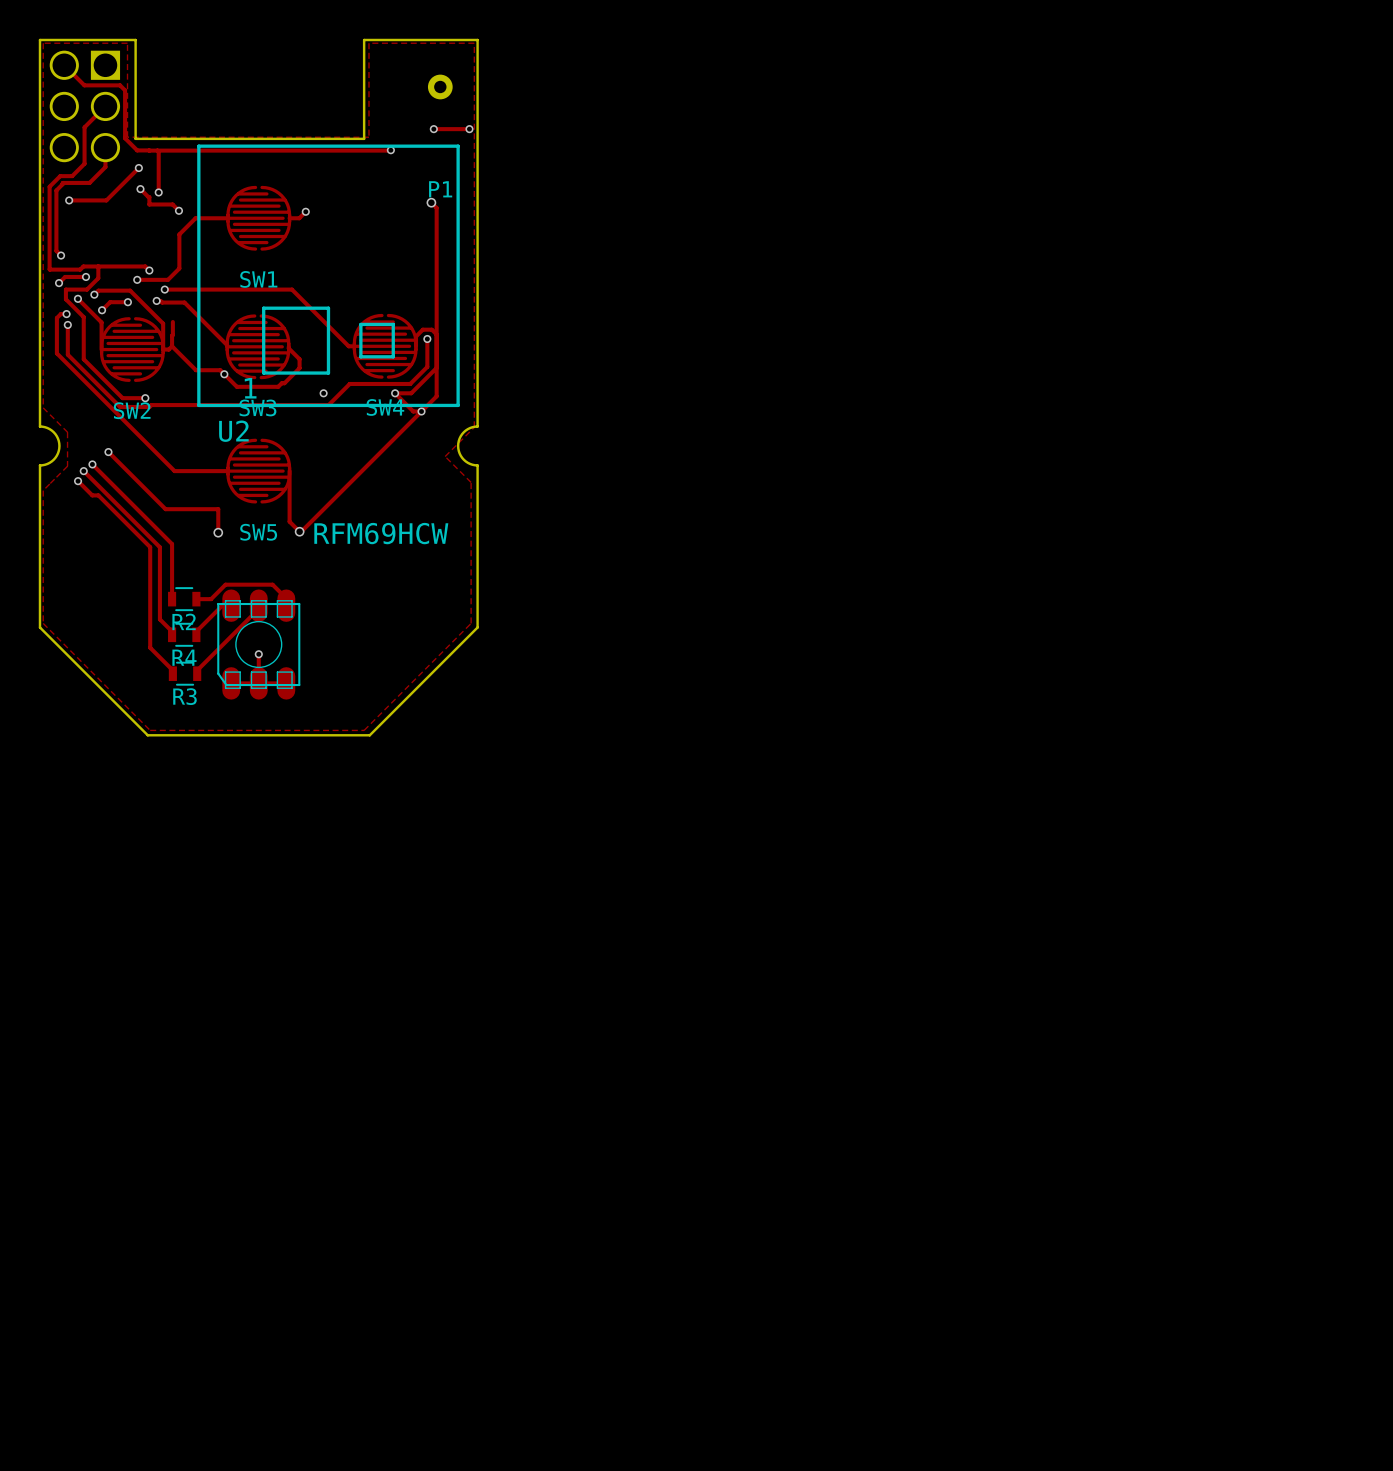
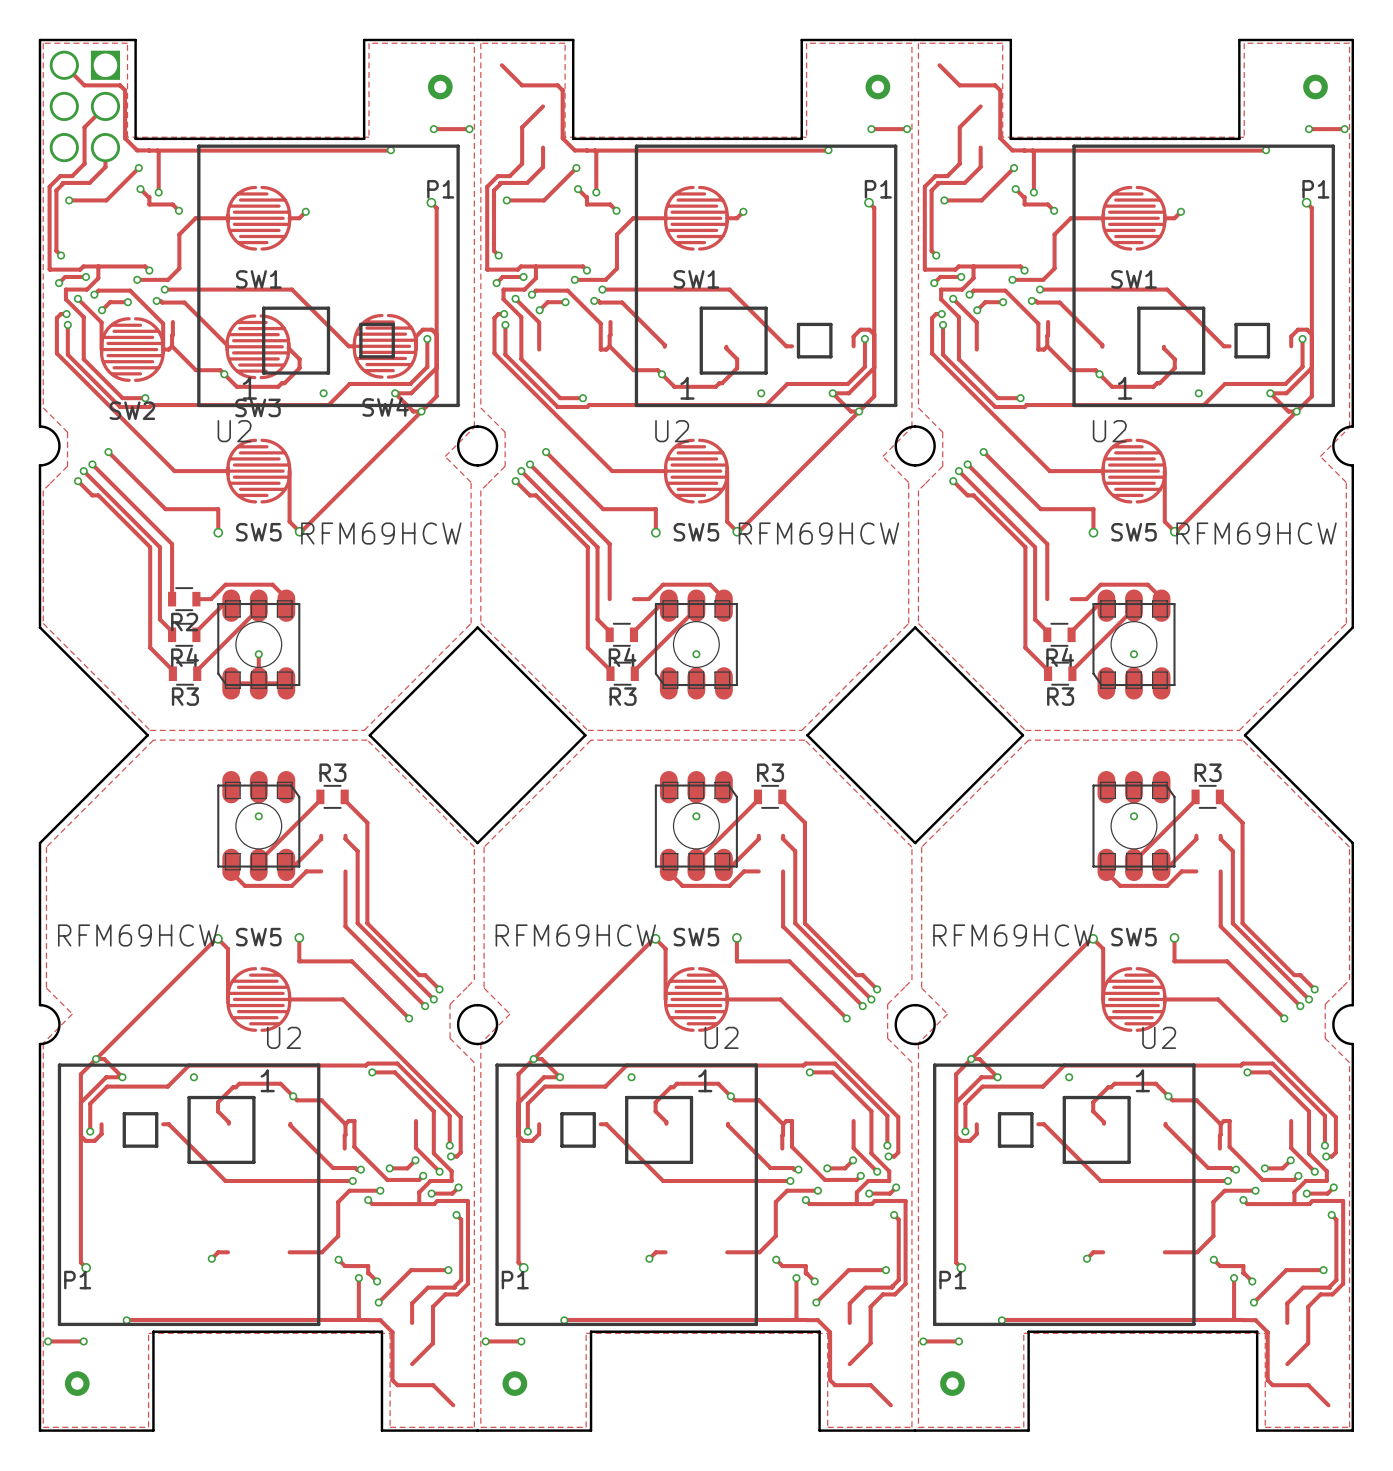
board edge: (477, 39) (477, 426) -> (477, 39) (573, 39) (573, 138) (801, 138) (801, 39) (1010, 39) (1010, 138) (1239, 138) (1239, 39) (1352, 39) (1352, 426) (1339, 432) (1333, 445) (1339, 459) (1352, 465) (1352, 627) (1245, 735) (1352, 843) (1352, 1005) (1339, 1010) (1333, 1024) (1339, 1038) (1352, 1044) (1352, 1430) (1257, 1430) (1257, 1331) (1028, 1331) (1028, 1430) (819, 1430) (819, 1331) (591, 1331) (591, 1430) (381, 1430) (381, 1331) (153, 1331) (153, 1430) (39, 1430) (39, 1044) (53, 1038) (59, 1024) (53, 1010) (39, 1005) (39, 843) (147, 735)
zone outline: none -> (480, 43) (565, 43) (565, 137) (806, 137) (806, 43) (911, 43) (911, 427) (882, 456) (908, 482) (908, 623) (801, 730) (587, 730) (480, 623) (480, 490) (505, 466) (505, 432) (480, 407) (480, 43)
zone outline: none -> (918, 43) (1002, 43) (1002, 137) (1244, 137) (1244, 43) (1349, 43) (1349, 427) (1320, 456) (1346, 482) (1346, 623) (1239, 730) (1025, 730) (918, 623) (918, 490) (942, 466) (942, 432) (918, 407) (918, 43)
track: none -> (501, 65) (521, 85) (557, 85) (562, 90) (562, 138) (574, 150) (586, 150)
track: none -> (939, 65) (959, 85) (995, 85) (1000, 90) (1000, 138) (1012, 150) (1024, 150)
P1: none -> (877, 86)
P1: none -> (1315, 86)
track: none -> (543, 106) (522, 127) (522, 163) (509, 176) (497, 176) (487, 186) (487, 269) (517, 269) (521, 266) (582, 266) (586, 270)
track: none -> (980, 106) (959, 127) (959, 163) (947, 176) (935, 176) (924, 186) (924, 269) (955, 269) (958, 266) (1020, 266) (1024, 270)
track: none -> (871, 129) (907, 129)
via: none -> (871, 129)
via: none -> (907, 129)
track: none -> (1309, 129) (1344, 129)
via: none -> (1309, 129)
via: none -> (1344, 129)
track: none -> (543, 147) (543, 167) (527, 182) (500, 182) (494, 190) (494, 250) (498, 255)
track: none -> (980, 147) (980, 167) (964, 182) (938, 182) (931, 190) (931, 250) (936, 255)
track: none -> (595, 150) (596, 192)
track: none -> (828, 150) (586, 150)
via: none -> (828, 150)
track: none -> (1032, 150) (1033, 192)
track: none -> (1266, 150) (1024, 150)
via: none -> (1266, 150)
track: none -> (576, 168) (544, 200) (506, 200)
via: none -> (576, 168)
track: none -> (1014, 168) (981, 200) (944, 200)
via: none -> (1014, 168)
track: none -> (578, 189) (586, 197) (586, 204) (610, 204) (616, 210)
via: none -> (578, 189)
track: none -> (1015, 189) (1024, 197) (1024, 204) (1047, 204) (1054, 210)
via: none -> (1015, 189)
via: none -> (596, 192)
via: none -> (1033, 192)
via: none -> (506, 200)
via: none -> (944, 200)
track: none -> (868, 202) (874, 207) (874, 396) (738, 531) (727, 521) (727, 471)
via: none -> (868, 202)
track: none -> (1306, 202) (1311, 207) (1311, 396) (1176, 531) (1164, 521) (1164, 471)
via: none -> (1306, 202)
via: none -> (616, 210)
via: none -> (1054, 210)
track: none -> (743, 211) (736, 218) (727, 218)
via: none -> (743, 211)
track: none -> (1180, 211) (1174, 218) (1164, 218)
via: none -> (1180, 211)
track: none -> (665, 218) (633, 218) (616, 234) (616, 268) (605, 279) (574, 279)
SW1: none -> (696, 218)
track: none -> (1103, 218) (1070, 218) (1054, 234) (1054, 268) (1043, 279) (1012, 279)
SW1: none -> (1133, 218)
via: none -> (498, 255)
via: none -> (936, 255)
track: none -> (535, 266) (535, 278) (524, 289) (503, 289) (503, 299) (521, 317) (521, 359) (560, 398) (582, 398)
track: none -> (973, 266) (973, 278) (962, 289) (941, 289) (941, 299) (958, 317) (958, 359) (997, 398) (1020, 398)
via: none -> (586, 270)
via: none -> (1024, 270)
U2: none -> RFM69HCW (766, 275)
U2: none -> RFM69HCW (1203, 275)
track: none -> (523, 276) (502, 276) (496, 283)
via: none -> (523, 276)
track: none -> (961, 276) (940, 276) (934, 283)
via: none -> (961, 276)
via: none -> (574, 279)
via: none -> (1012, 279)
via: none -> (496, 283)
via: none -> (934, 283)
track: none -> (602, 289) (729, 289) (786, 346) (792, 346)
via: none -> (602, 289)
track: none -> (1039, 289) (1167, 289) (1223, 346) (1229, 346)
via: none -> (1039, 289)
track: none -> (531, 294) (536, 290) (567, 290) (600, 323) (600, 349) (606, 349) (609, 346)
via: none -> (531, 294)
track: none -> (969, 294) (973, 290) (1005, 290) (1038, 323) (1038, 349) (1044, 349) (1047, 346)
via: none -> (969, 294)
track: none -> (515, 298) (539, 322) (539, 349)
via: none -> (515, 298)
track: none -> (953, 298) (976, 322) (976, 349)
via: none -> (953, 298)
track: none -> (594, 300) (622, 302) (664, 346)
via: none -> (594, 300)
track: none -> (1031, 300) (1059, 302) (1102, 346)
via: none -> (1031, 300)
track: none -> (565, 302) (547, 302) (539, 310)
via: none -> (565, 302)
track: none -> (1003, 302) (985, 302) (977, 310)
via: none -> (1003, 302)
via: none -> (539, 310)
via: none -> (977, 310)
track: none -> (504, 314) (498, 314) (494, 318) (494, 353) (612, 471) (665, 471)
via: none -> (504, 314)
track: none -> (941, 314) (936, 314) (932, 318) (932, 353) (1049, 471) (1103, 471)
via: none -> (941, 314)
track: none -> (610, 321) (609, 346)
track: none -> (1048, 321) (1047, 346)
track: none -> (505, 324) (505, 354) (557, 407) (587, 407) (589, 405) (766, 405) (787, 383) (847, 383) (864, 366) (864, 339)
via: none -> (505, 324)
track: none -> (943, 324) (943, 354) (995, 407) (1024, 407) (1026, 405) (1203, 405) (1224, 383) (1285, 383) (1302, 366) (1302, 339)
via: none -> (943, 324)
track: none -> (874, 334) (869, 329) (860, 329) (853, 336) (853, 346)
track: none -> (1311, 334) (1307, 329) (1298, 329) (1291, 336) (1291, 346)
via: none -> (864, 339)
via: none -> (1302, 339)
track: none -> (609, 346) (633, 370) (657, 370) (674, 386) (715, 386) (722, 383) (737, 368) (737, 359) (726, 346)
track: none -> (1047, 346) (1071, 370) (1095, 370) (1112, 386) (1153, 386) (1159, 383) (1174, 368) (1174, 359) (1163, 346)
track: none -> (874, 367) (848, 393) (832, 393) (850, 411) (859, 411)
track: none -> (1311, 367) (1286, 393) (1270, 393) (1288, 411) (1296, 411)
via: none -> (661, 374)
via: none -> (1099, 374)
via: none -> (761, 393)
via: none -> (832, 393)
via: none -> (1198, 393)
via: none -> (1270, 393)
via: none -> (582, 398)
via: none -> (1020, 398)
via: none -> (859, 411)
via: none -> (1296, 411)
board edge: none -> (915, 426) (928, 432) (934, 445) (928, 459) (915, 465) (901, 459) (895, 445) (901, 432) (915, 426)
track: none -> (546, 452) (603, 509) (655, 509) (655, 532)
via: none -> (546, 452)
track: none -> (983, 452) (1040, 509) (1093, 509) (1093, 532)
via: none -> (983, 452)
track: none -> (530, 464) (609, 544) (609, 599)
via: none -> (530, 464)
track: none -> (967, 464) (1047, 544) (1047, 599)
via: none -> (967, 464)
board edge: (477, 465) (477, 627) -> (477, 465) (491, 459) (497, 445) (491, 432) (477, 426)
track: none -> (521, 471) (597, 547) (597, 619) (609, 631) (609, 634)
via: none -> (521, 471)
SW5: none -> (696, 471)
track: none -> (958, 471) (1035, 547) (1035, 619) (1047, 631) (1047, 634)
via: none -> (958, 471)
SW5: none -> (1133, 471)
track: none -> (515, 481) (529, 495) (536, 495) (587, 547) (587, 647) (610, 670) (610, 673)
via: none -> (515, 481)
track: none -> (953, 481) (967, 495) (973, 495) (1025, 547) (1025, 647) (1048, 670) (1048, 673)
via: none -> (953, 481)
via: none -> (737, 531)
via: none -> (1174, 531)
via: none -> (655, 532)
via: none -> (1093, 532)
track: none -> (633, 599) (648, 599) (663, 584) (710, 584) (723, 598) (723, 605)
track: none -> (1071, 599) (1086, 599) (1100, 584) (1147, 584) (1161, 598) (1161, 605)
track: none -> (668, 605) (659, 605) (633, 631) (633, 634)
track: none -> (696, 605) (696, 608) (634, 670) (634, 673)
track: none -> (1106, 605) (1097, 605) (1071, 631) (1071, 634)
track: none -> (1133, 605) (1133, 608) (1072, 670) (1072, 673)
board edge: none -> (915, 627) (807, 735) (915, 843) (1022, 735) (915, 627)
R4: none -> (621, 634)
R4: none -> (1059, 634)
part: none -> (696, 644)
part: none -> (1133, 644)
via: none -> (696, 654)
via: none -> (1133, 654)
R3: none -> (622, 673)
R3: none -> (1060, 673)
board edge: (147, 735) (369, 735) -> (477, 627) (585, 735) (477, 843) (369, 735)
zone outline: none -> (153, 740) (367, 740) (474, 847) (474, 980) (450, 1004) (450, 1038) (474, 1062) (474, 1427) (390, 1427) (390, 1333) (148, 1333) (148, 1427) (43, 1427) (43, 1043) (72, 1014) (46, 988) (46, 847) (153, 740)
zone outline: none -> (591, 740) (804, 740) (911, 847) (911, 980) (887, 1004) (887, 1038) (911, 1062) (911, 1427) (827, 1427) (827, 1333) (586, 1333) (586, 1427) (480, 1427) (480, 1043) (510, 1014) (484, 988) (484, 847) (591, 740)
zone outline: none -> (1028, 740) (1242, 740) (1349, 847) (1349, 980) (1325, 1004) (1325, 1038) (1349, 1062) (1349, 1427) (1265, 1427) (1265, 1333) (1023, 1333) (1023, 1427) (918, 1427) (918, 1043) (947, 1014) (921, 988) (921, 847) (1028, 740)
track: none -> (320, 796) (320, 800) (258, 861) (258, 864)
R3: none -> (332, 796)
track: none -> (344, 796) (344, 800) (367, 822) (367, 923) (419, 975) (425, 975) (439, 989)
track: none -> (757, 796) (757, 800) (696, 861) (696, 864)
R3: none -> (770, 796)
track: none -> (782, 796) (782, 800) (804, 822) (804, 923) (856, 975) (862, 975) (877, 989)
track: none -> (1195, 796) (1195, 800) (1133, 861) (1133, 864)
R3: none -> (1207, 796)
track: none -> (1219, 796) (1219, 800) (1242, 822) (1242, 923) (1294, 975) (1300, 975) (1314, 989)
via: none -> (258, 816)
via: none -> (696, 816)
via: none -> (1133, 816)
part: none -> (258, 826)
part: none -> (696, 826)
part: none -> (1133, 826)
track: none -> (321, 835) (321, 839) (295, 864) (286, 864)
track: none -> (345, 835) (345, 839) (357, 851) (357, 923) (433, 999)
track: none -> (758, 835) (758, 839) (732, 864) (723, 864)
track: none -> (783, 835) (783, 839) (795, 851) (795, 923) (871, 999)
track: none -> (1196, 835) (1196, 839) (1170, 864) (1161, 864)
track: none -> (1220, 835) (1220, 839) (1232, 851) (1232, 923) (1309, 999)
track: none -> (231, 864) (231, 872) (244, 885) (292, 885) (306, 871) (321, 871)
track: none -> (668, 864) (668, 872) (682, 885) (729, 885) (744, 871) (758, 871)
track: none -> (1106, 864) (1106, 872) (1120, 885) (1167, 885) (1181, 871) (1196, 871)
track: none -> (345, 871) (345, 926) (425, 1006)
track: none -> (783, 871) (783, 926) (862, 1006)
track: none -> (1220, 871) (1220, 926) (1300, 1006)
track: none -> (299, 937) (299, 961) (351, 961) (409, 1018)
via: none -> (299, 937)
track: none -> (736, 937) (736, 961) (789, 961) (846, 1018)
via: none -> (736, 937)
track: none -> (1174, 937) (1174, 961) (1227, 961) (1284, 1018)
via: none -> (1174, 937)
via: none -> (217, 938)
via: none -> (655, 938)
via: none -> (1093, 938)
via: none -> (439, 989)
via: none -> (877, 989)
via: none -> (1314, 989)
track: none -> (227, 999) (227, 948) (216, 938) (80, 1074) (80, 1262) (86, 1267)
SW5: none -> (258, 999)
track: none -> (289, 999) (342, 999) (460, 1117) (460, 1152) (456, 1156) (451, 1156)
via: none -> (433, 999)
track: none -> (665, 999) (665, 948) (653, 938) (518, 1074) (518, 1262) (523, 1267)
SW5: none -> (696, 999)
track: none -> (727, 999) (780, 999) (898, 1117) (898, 1152) (894, 1156) (888, 1156)
via: none -> (871, 999)
track: none -> (1103, 999) (1103, 948) (1091, 938) (956, 1074) (956, 1262) (961, 1267)
SW5: none -> (1133, 999)
track: none -> (1164, 999) (1218, 999) (1335, 1117) (1335, 1152) (1331, 1156) (1326, 1156)
via: none -> (1309, 999)
board edge: none -> (477, 1005) (491, 1010) (497, 1024) (491, 1038) (477, 1044) (463, 1038) (458, 1024) (463, 1010) (477, 1005)
board edge: none -> (915, 1005) (928, 1010) (934, 1024) (928, 1038) (915, 1044) (901, 1038) (895, 1024) (901, 1010) (915, 1005)
via: none -> (425, 1006)
via: none -> (862, 1006)
via: none -> (1300, 1006)
via: none -> (409, 1018)
via: none -> (846, 1018)
via: none -> (1284, 1018)
track: none -> (96, 1059) (104, 1059) (122, 1077) (106, 1077) (80, 1102)
via: none -> (96, 1059)
track: none -> (533, 1059) (541, 1059) (560, 1077) (543, 1077) (518, 1102)
via: none -> (533, 1059)
track: none -> (971, 1059) (979, 1059) (997, 1077) (981, 1077) (956, 1102)
via: none -> (971, 1059)
track: none -> (372, 1072) (394, 1072) (433, 1111) (433, 1153) (451, 1171) (451, 1180) (430, 1180) (419, 1192) (419, 1204)
via: none -> (372, 1072)
track: none -> (809, 1072) (832, 1072) (871, 1111) (871, 1153) (889, 1171) (889, 1180) (868, 1180) (856, 1192) (856, 1204)
via: none -> (809, 1072)
track: none -> (1247, 1072) (1270, 1072) (1309, 1111) (1309, 1153) (1326, 1171) (1326, 1180) (1305, 1180) (1294, 1192) (1294, 1204)
via: none -> (1247, 1072)
via: none -> (122, 1077)
via: none -> (193, 1077)
via: none -> (560, 1077)
via: none -> (631, 1077)
via: none -> (997, 1077)
via: none -> (1069, 1077)
via: none -> (293, 1096)
via: none -> (730, 1096)
via: none -> (1168, 1096)
track: none -> (416, 1121) (416, 1148) (439, 1171)
track: none -> (853, 1121) (853, 1148) (877, 1171)
track: none -> (1291, 1121) (1291, 1148) (1314, 1171)
track: none -> (228, 1123) (218, 1111) (218, 1102) (233, 1087) (239, 1083) (280, 1083) (297, 1100) (321, 1100) (345, 1124)
track: none -> (290, 1123) (333, 1168) (360, 1169)
track: none -> (666, 1123) (655, 1111) (655, 1102) (670, 1087) (676, 1083) (718, 1083) (734, 1100) (759, 1100) (783, 1124)
track: none -> (727, 1123) (770, 1168) (798, 1169)
track: none -> (1104, 1123) (1093, 1111) (1093, 1102) (1108, 1087) (1114, 1083) (1155, 1083) (1172, 1100) (1196, 1100) (1220, 1124)
track: none -> (1165, 1123) (1208, 1168) (1236, 1169)
track: none -> (101, 1124) (101, 1134) (94, 1140) (85, 1140) (80, 1136)
track: none -> (163, 1124) (168, 1124) (225, 1180) (352, 1180)
track: none -> (345, 1124) (348, 1121) (354, 1121) (354, 1146) (387, 1179) (419, 1179) (423, 1175)
track: none -> (345, 1124) (344, 1148)
track: none -> (539, 1124) (539, 1134) (532, 1140) (523, 1140) (518, 1136)
track: none -> (600, 1124) (606, 1124) (663, 1180) (790, 1180)
track: none -> (783, 1124) (786, 1121) (792, 1121) (792, 1146) (824, 1179) (856, 1179) (860, 1175)
track: none -> (783, 1124) (782, 1148)
track: none -> (976, 1124) (976, 1134) (969, 1140) (960, 1140) (956, 1136)
track: none -> (1038, 1124) (1044, 1124) (1100, 1180) (1227, 1180)
track: none -> (1220, 1124) (1223, 1121) (1229, 1121) (1229, 1146) (1262, 1179) (1294, 1179) (1298, 1175)
track: none -> (1220, 1124) (1219, 1148)
track: none -> (90, 1131) (90, 1103) (107, 1086) (167, 1086) (188, 1065) (366, 1065) (368, 1063) (397, 1063) (449, 1115) (449, 1145)
via: none -> (90, 1131)
track: none -> (527, 1131) (527, 1103) (544, 1086) (605, 1086) (626, 1065) (803, 1065) (805, 1063) (835, 1063) (887, 1115) (887, 1145)
via: none -> (527, 1131)
track: none -> (965, 1131) (965, 1103) (982, 1086) (1043, 1086) (1064, 1065) (1241, 1065) (1243, 1063) (1272, 1063) (1324, 1115) (1324, 1145)
via: none -> (965, 1131)
via: none -> (449, 1145)
via: none -> (887, 1145)
via: none -> (1324, 1145)
via: none -> (451, 1156)
via: none -> (888, 1156)
via: none -> (1326, 1156)
track: none -> (415, 1160) (407, 1168) (389, 1168)
via: none -> (415, 1160)
track: none -> (853, 1160) (845, 1168) (827, 1168)
via: none -> (853, 1160)
track: none -> (1290, 1160) (1282, 1168) (1264, 1168)
via: none -> (1290, 1160)
via: none -> (389, 1168)
via: none -> (827, 1168)
via: none -> (1264, 1168)
via: none -> (360, 1169)
via: none -> (798, 1169)
via: none -> (1236, 1169)
via: none -> (439, 1171)
via: none -> (877, 1171)
via: none -> (1314, 1171)
via: none -> (423, 1175)
via: none -> (860, 1175)
via: none -> (1298, 1175)
via: none -> (352, 1180)
via: none -> (790, 1180)
via: none -> (1227, 1180)
track: none -> (458, 1187) (452, 1193) (431, 1193)
via: none -> (458, 1187)
track: none -> (896, 1187) (890, 1193) (869, 1193)
via: none -> (896, 1187)
track: none -> (1333, 1187) (1327, 1193) (1306, 1193)
via: none -> (1333, 1187)
track: none -> (380, 1190) (349, 1190) (338, 1202) (338, 1236) (321, 1252) (289, 1252)
via: none -> (380, 1190)
track: none -> (817, 1190) (787, 1190) (775, 1202) (775, 1236) (759, 1252) (727, 1252)
via: none -> (817, 1190)
track: none -> (1255, 1190) (1224, 1190) (1213, 1202) (1213, 1236) (1197, 1252) (1164, 1252)
via: none -> (1255, 1190)
via: none -> (431, 1193)
via: none -> (869, 1193)
via: none -> (1306, 1193)
U2: none -> RFM69HCW (189, 1194)
U2: none -> RFM69HCW (626, 1194)
U2: none -> RFM69HCW (1064, 1194)
track: none -> (368, 1200) (372, 1204) (434, 1204) (437, 1200) (467, 1201) (467, 1283) (457, 1294) (445, 1294) (433, 1306) (433, 1343) (412, 1364)
via: none -> (368, 1200)
track: none -> (805, 1200) (809, 1204) (871, 1204) (874, 1200) (905, 1201) (905, 1283) (894, 1294) (882, 1294) (870, 1306) (870, 1343) (849, 1364)
via: none -> (805, 1200)
track: none -> (1243, 1200) (1247, 1204) (1309, 1204) (1312, 1200) (1343, 1201) (1343, 1283) (1332, 1294) (1320, 1294) (1308, 1306) (1308, 1343) (1287, 1364)
via: none -> (1243, 1200)
track: none -> (456, 1215) (461, 1219) (461, 1280) (454, 1287) (427, 1287) (412, 1303) (412, 1322)
via: none -> (456, 1215)
track: none -> (894, 1215) (898, 1219) (898, 1280) (892, 1287) (865, 1287) (849, 1303) (849, 1322)
via: none -> (894, 1215)
track: none -> (1331, 1215) (1336, 1219) (1336, 1280) (1329, 1287) (1303, 1287) (1287, 1303) (1287, 1322)
via: none -> (1331, 1215)
track: none -> (227, 1252) (218, 1252) (211, 1258)
track: none -> (665, 1252) (655, 1252) (649, 1258)
track: none -> (1103, 1252) (1093, 1252) (1086, 1258)
via: none -> (211, 1258)
via: none -> (649, 1258)
via: none -> (1086, 1258)
track: none -> (338, 1259) (344, 1266) (368, 1266) (368, 1273) (377, 1281)
via: none -> (338, 1259)
track: none -> (776, 1259) (782, 1266) (805, 1266) (805, 1273) (814, 1281)
via: none -> (776, 1259)
track: none -> (1213, 1259) (1220, 1266) (1243, 1266) (1243, 1273) (1252, 1281)
via: none -> (1213, 1259)
via: none -> (86, 1267)
via: none -> (523, 1267)
via: none -> (961, 1267)
track: none -> (448, 1270) (411, 1270) (378, 1302)
via: none -> (448, 1270)
track: none -> (886, 1270) (848, 1270) (816, 1302)
via: none -> (886, 1270)
track: none -> (1323, 1270) (1286, 1270) (1253, 1302)
via: none -> (1323, 1270)
track: none -> (358, 1278) (360, 1319)
via: none -> (358, 1278)
track: none -> (796, 1278) (797, 1319)
via: none -> (796, 1278)
track: none -> (1234, 1278) (1235, 1319)
via: none -> (1234, 1278)
via: none -> (377, 1281)
via: none -> (814, 1281)
via: none -> (1252, 1281)
via: none -> (378, 1302)
via: none -> (816, 1302)
via: none -> (1253, 1302)
track: none -> (368, 1319) (126, 1320)
track: none -> (805, 1319) (564, 1320)
track: none -> (1243, 1319) (1001, 1320)
via: none -> (126, 1320)
track: none -> (368, 1320) (380, 1320) (392, 1332) (392, 1380) (397, 1385) (433, 1385) (453, 1405)
via: none -> (564, 1320)
track: none -> (805, 1320) (817, 1320) (830, 1332) (830, 1380) (835, 1385) (870, 1385) (890, 1405)
via: none -> (1001, 1320)
track: none -> (1243, 1320) (1255, 1320) (1267, 1332) (1267, 1380) (1272, 1385) (1308, 1385) (1328, 1405)
track: none -> (48, 1341) (83, 1341)
via: none -> (48, 1341)
via: none -> (83, 1341)
track: none -> (485, 1341) (521, 1341)
via: none -> (485, 1341)
via: none -> (521, 1341)
track: none -> (923, 1341) (958, 1341)
via: none -> (923, 1341)
via: none -> (958, 1341)
P1: none -> (77, 1383)
P1: none -> (514, 1383)
P1: none -> (952, 1383)

